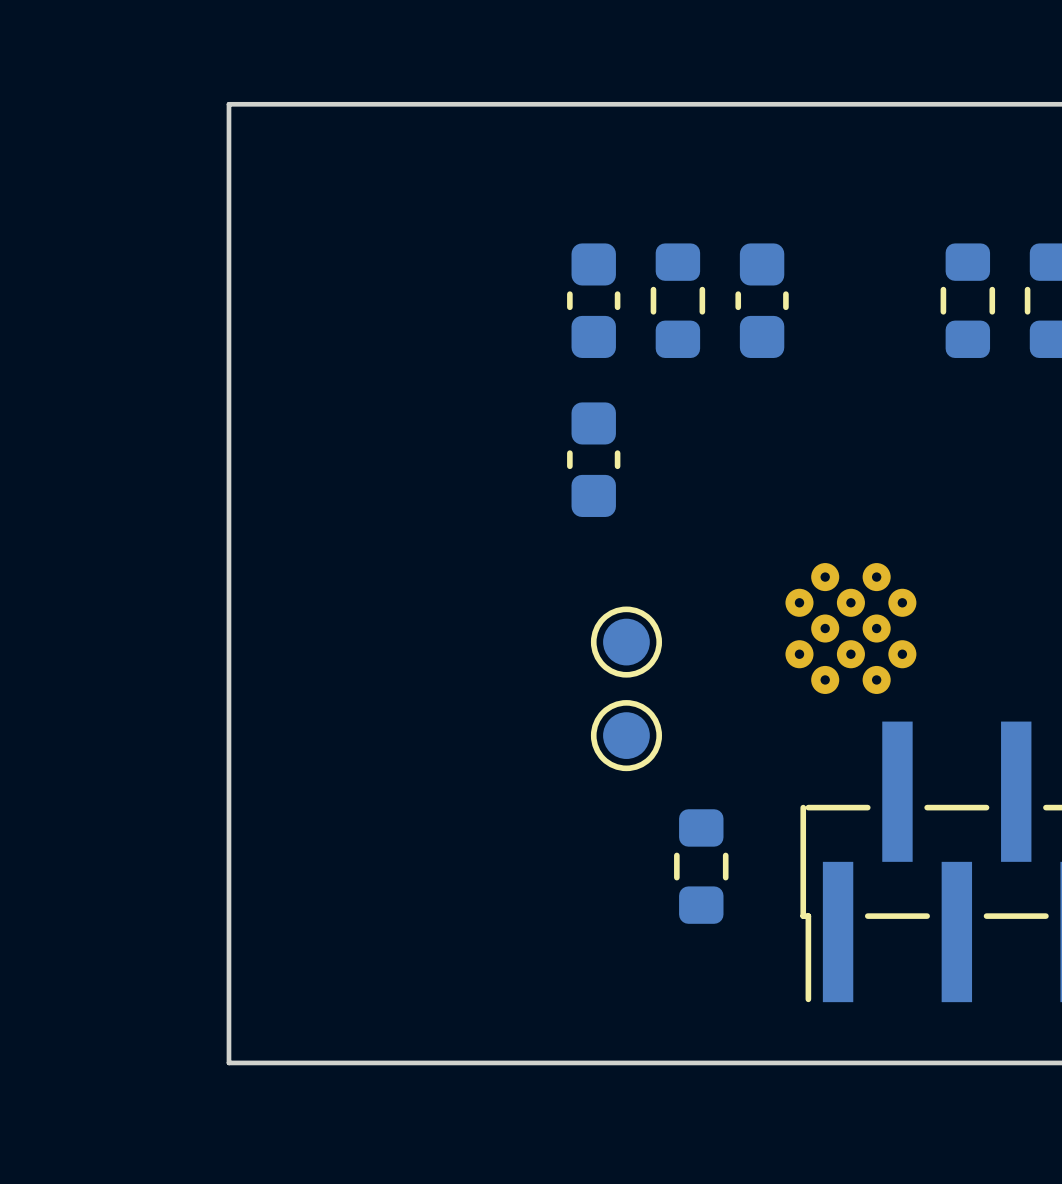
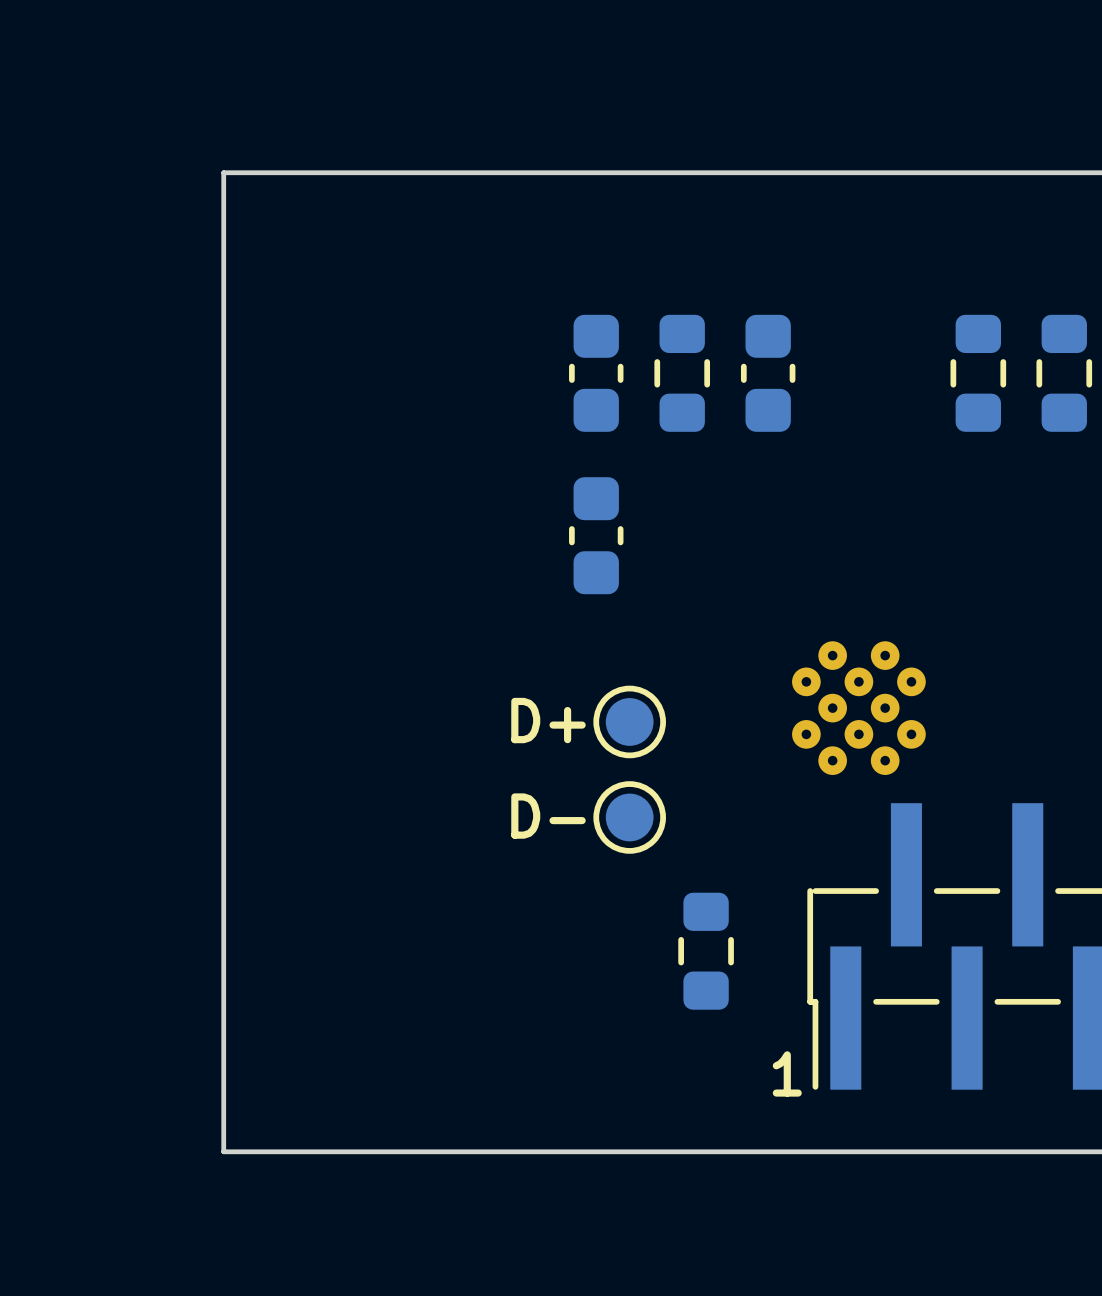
text: none -> D+ (548, 720)
text: none -> D- (548, 816)
text: none -> 1 (787, 1073)

